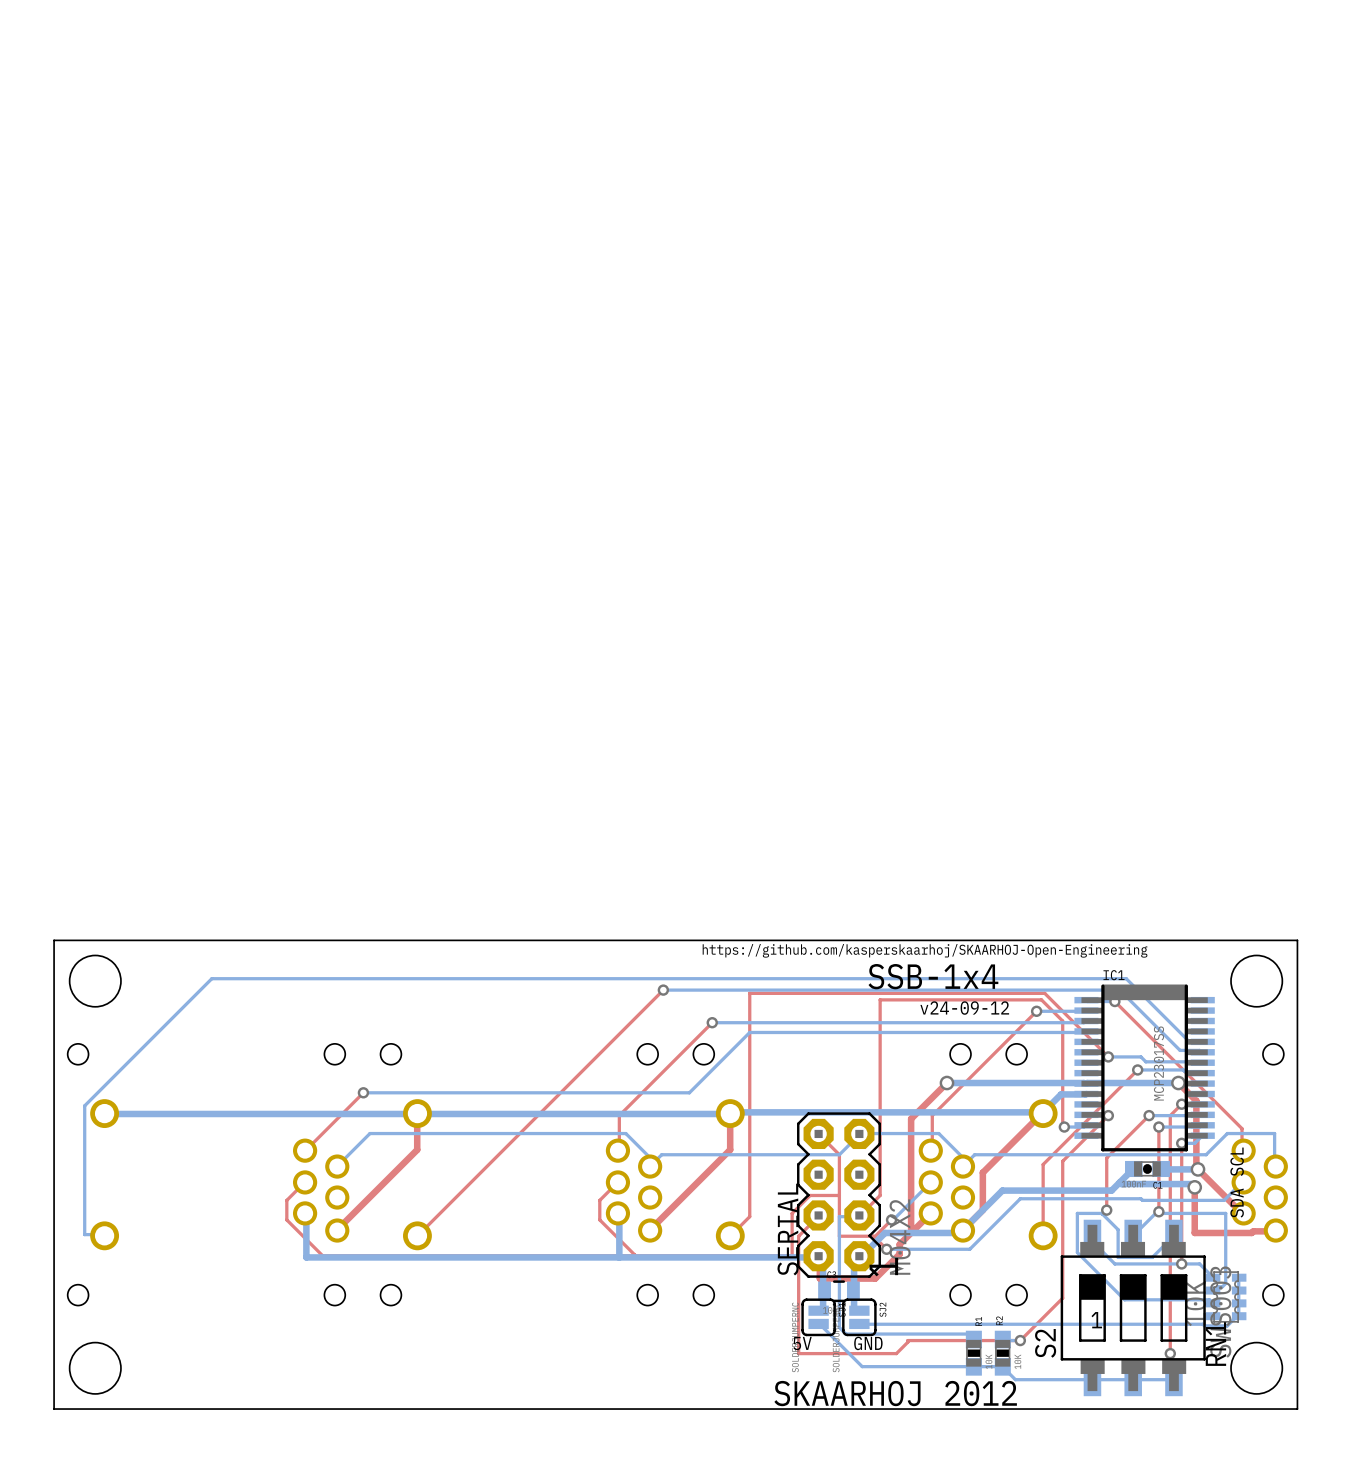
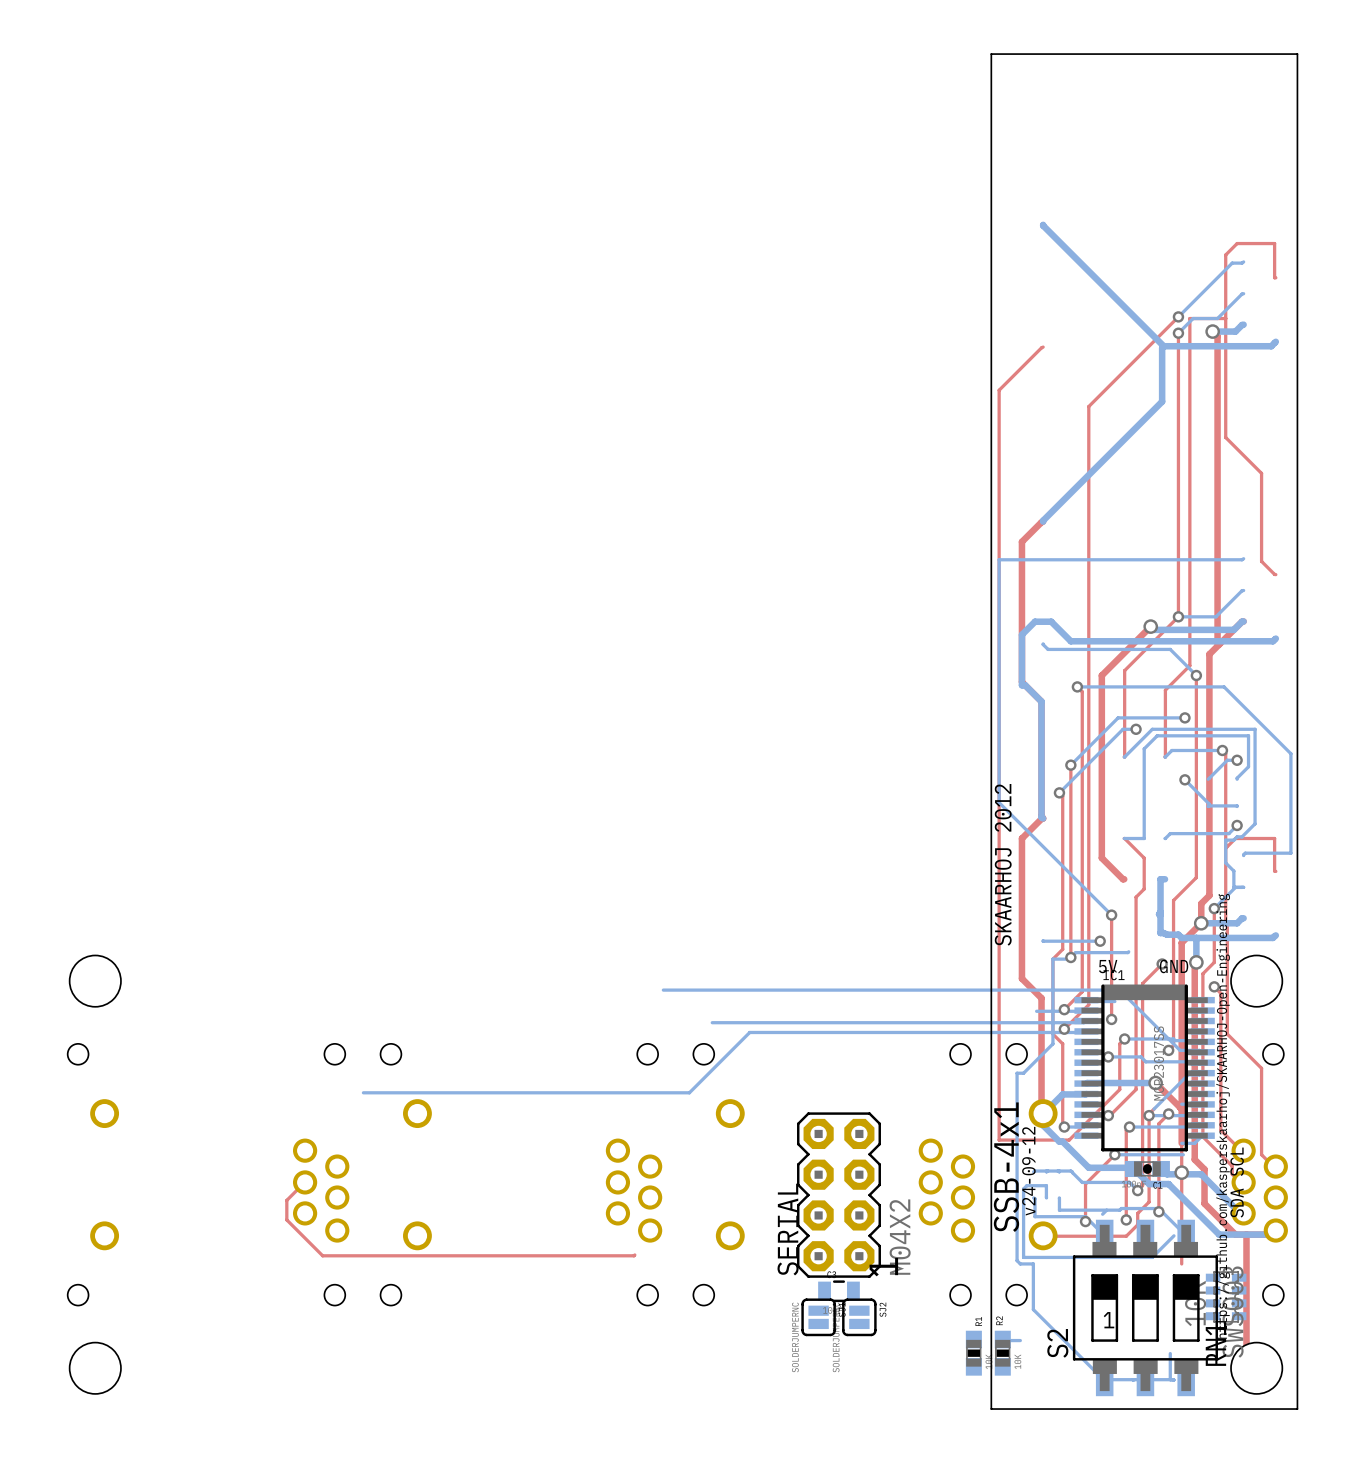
bottom track: none -> (1043, 224) (1163, 346)
bottom track: none -> (1243, 261) (1232, 263) (1178, 316)
top track: none -> (1275, 277) (1274, 243) (1237, 243) (1225, 254) (1225, 437) (1261, 473) (1261, 561) (1275, 574)
bottom track: none -> (1243, 293) (1217, 318) (1193, 318) (1178, 333)
top track: none -> (1178, 316) (1088, 406) (1088, 1004) (1064, 1029)
via: none -> (1178, 316)
top track: none -> (1225, 318) (1189, 318) (1189, 665) (1165, 690) (1164, 757)
bottom track: none -> (1243, 324) (1235, 331) (1212, 331)
top track: none -> (1212, 331) (1217, 336) (1217, 642) (1219, 644)
via: none -> (1212, 331)
top track: none -> (1178, 333) (1178, 616) (1124, 670) (1124, 757)
via: none -> (1178, 333)
bottom track: none -> (1275, 341) (1271, 346) (1163, 346)
bottom track: none -> (1163, 346) (1162, 347) (1162, 401) (1043, 521)
top track: none -> (1043, 347) (999, 390) (999, 1140) (1069, 1140) (1119, 1089) (1119, 1043) (1124, 1039)
top track: none -> (1043, 521) (1021, 541) (1021, 682) (1041, 701) (1041, 815) (1043, 818) (1021, 838) (1021, 978) (1041, 998) (1041, 1113) (1043, 1115)
bottom track: none -> (1243, 558) (999, 559) (999, 802) (1111, 915)
bottom track: none -> (1243, 590) (1215, 616) (1178, 616)
via: none -> (1178, 616)
bottom track: none -> (1243, 621) (1233, 629) (1153, 629) (1150, 626)
top track: none -> (1243, 621) (1209, 654) (1209, 895) (1201, 903) (1201, 923) (1181, 942) (1181, 1105) (1180, 1107)
top track: none -> (1150, 626) (1101, 675) (1101, 858) (1124, 879)
via: none -> (1150, 626)
bottom track: none -> (1275, 638) (1272, 641) (1070, 641) (1051, 621) (1035, 621) (1021, 634) (1021, 685) (1025, 685) (1041, 701) (1041, 817) (1043, 818)
bottom track: none -> (1043, 643) (1048, 649) (1170, 649) (1196, 675)
top track: none -> (1196, 675) (1196, 877) (1173, 900) (1173, 1045) (1168, 1050)
via: none -> (1196, 675)
bottom track: none -> (1077, 686) (1224, 686) (1290, 753) (1290, 853) (1245, 853) (1243, 855)
top track: none -> (1077, 686) (1082, 691) (1082, 991) (1064, 1009)
via: none -> (1077, 686)
bottom track: none -> (1184, 717) (1118, 717) (1070, 765)
via: none -> (1184, 717)
bottom track: none -> (1136, 729) (1123, 729) (1059, 792)
via: none -> (1136, 729)
bottom track: none -> (1222, 750) (1171, 750) (1164, 757)
top track: none -> (1222, 750) (1225, 753) (1226, 847)
via: none -> (1222, 750)
bottom track: none -> (1124, 757) (1152, 729) (1255, 729) (1255, 823) (1242, 836) (1237, 836) (1233, 840) (1225, 840) (1225, 862) (1233, 871) (1233, 887) (1243, 887) (1235, 887) (1214, 908)
bottom track: none -> (1237, 760) (1227, 760) (1208, 779)
via: none -> (1237, 760)
top track: none -> (1070, 765) (1070, 957)
via: none -> (1070, 765)
bottom track: none -> (1184, 779) (1209, 804) (1208, 806) (1237, 806)
via: none -> (1184, 779)
bottom track: none -> (1237, 779) (1248, 766) (1248, 735) (1157, 735) (1144, 748) (1144, 838) (1124, 838)
via: none -> (1059, 792)
bottom track: none -> (1237, 825) (1228, 833) (1170, 833) (1164, 838)
via: none -> (1237, 825)
top track: none -> (1124, 838) (1144, 858) (1144, 889) (1136, 897) (1136, 1089) (1111, 1113)
text: none -> SKAARHOJ 2012 (1003, 864)
top track: none -> (1275, 871) (1274, 838) (1235, 838) (1225, 848) (1227, 1034) (1261, 1068) (1261, 1154) (1275, 1168)
bottom track: none -> (1164, 879) (1160, 879) (1160, 933) (1178, 934) (1181, 937) (1272, 937) (1275, 935)
top track: none -> (1214, 908) (1214, 962) (1202, 973) (1202, 1136) (1232, 1166) (1232, 1174) (1243, 1184)
via: none -> (1214, 908)
top track: none -> (1111, 915) (1111, 1019)
via: none -> (1111, 915)
bottom track: none -> (1243, 918) (1237, 923) (1201, 923)
via: none -> (1201, 923)
bottom track: none -> (1196, 937) (1196, 962)
bottom track: none -> (1043, 940) (1100, 941)
board edge: (1297, 940) (54, 940) (54, 1409) (991, 1409) -> (1297, 940) (1297, 54) (991, 54) (991, 1409)
via: none -> (1100, 941)
text: https://github.com/kasperskaarhoj/SKAARHOJ-Open-Engineering (925, 950) -> none
via: none -> (1070, 957)
top track: none -> (1196, 962) (1194, 964) (1194, 1159) (1204, 1169) (1204, 1203) (1235, 1234) (1274, 1234) (1275, 1232)
via: none -> (1196, 962)
top track: none -> (1162, 964) (1142, 983) (1142, 1185) (1137, 1190)
via: none -> (1162, 964)
text: none -> 5V (1108, 966)
text: none -> GND (1174, 966)
text: SSB-1x4 (933, 976) -> none
top track: none -> (1214, 986) (1220, 993) (1220, 1130) (1243, 1152)
via: none -> (1214, 986)
top track: (663, 990) (417, 1235) -> none
via: (663, 990) -> none
top track: (1114, 1001) (1242, 1128) (1242, 1149) (1243, 1150) -> none
via position: (1114, 1001) -> (1111, 1019)
text rotation: 0° (964, 1008) -> 90° counterclockwise (1028, 1171)
text position: v24-09-12 (964, 1008) -> v24-09-12 (1028, 1171)
via: none -> (1064, 1009)
top track: (1036, 1011) (932, 1115) (930, 1150) -> none
via: (1036, 1011) -> none
top track: (712, 1022) (619, 1115) (617, 1150) -> none
via: (712, 1022) -> none
via: none -> (1064, 1029)
via: none -> (1124, 1039)
bottom track: (1188, 1040) (1126, 978) (211, 978) (84, 1105) (84, 1234) (104, 1235) -> (1188, 1040) (1124, 1039)
top track: (1062, 1043) (1062, 1021) (1041, 999) (880, 999) (880, 1195) (859, 1215) -> (1062, 1043) (1052, 1034) (1052, 959) (1062, 949) (1062, 796) (1059, 792)
via: none -> (1168, 1050)
top track: (1108, 1056) (1044, 993) (749, 993) (749, 1216) (730, 1235) -> none
bottom track: (1137, 1069) (1183, 1069) (1202, 1073) -> (1153, 1109) (1188, 1074) (1202, 1073)
top track: (1137, 1069) (1043, 1164) (1043, 1235) -> none
via: (1137, 1069) -> none
bottom track: (946, 1083) (1086, 1083) -> none
top track: (946, 1083) (911, 1118) (911, 1229) (912, 1231) -> none
via: (946, 1083) -> none
top track: none -> (1155, 1083) (1181, 1109) (1181, 1143)
bottom track: (1178, 1083) (1155, 1083) -> none
top track: (1178, 1083) (1196, 1100) (1196, 1167) (1243, 1213) -> none
via position: (1178, 1083) -> (1155, 1083)
top track: (363, 1092) (305, 1150) -> none
via: (363, 1092) -> none
bottom track: (1062, 1094) (1043, 1113) (1039, 1113) (1038, 1112) (104, 1113) -> none
top track: (1181, 1104) (1170, 1115) (1170, 1353) -> none
via: (1181, 1104) -> none
top track: none -> (1153, 1109) (1149, 1113) (1149, 1202) (1137, 1213) (1137, 1224) (1126, 1236) (1043, 1237)
top track: (417, 1113) (417, 1149) (337, 1230) -> none
top track: (730, 1113) (730, 1149) (650, 1230) -> none
top track: (1043, 1113) (982, 1172) (982, 1210) (962, 1230) -> none
top track: none -> (1168, 1113) (1158, 1123) (1158, 1127)
via: none -> (1168, 1113)
top track: (1108, 1115) (1062, 1161) (1062, 1298) (1020, 1340) (907, 1340) (896, 1353) (798, 1353) (798, 1236) (818, 1215) -> none
top track: (1149, 1115) (1106, 1157) (1106, 1210) -> none
text: none -> https://github.com/kasperskaarhoj/SKAARHOJ-Open-Engineering (1223, 1116)
top track: none -> (1129, 1127) (1126, 1130) (1126, 1219)
via: none -> (1129, 1127)
bottom track: none -> (1158, 1127) (1129, 1127)
via: (1158, 1127) -> none
top track: (818, 1133) (839, 1154) (839, 1236) (873, 1236) (886, 1249) -> none
via: (1181, 1143) -> none
bottom track: (1114, 1154) (974, 1154) (962, 1166) (966, 1161) (938, 1133) (860, 1133) (839, 1154) (661, 1154) (650, 1166) (653, 1161) (625, 1133) (369, 1133) (337, 1166) -> none
top track: none -> (1114, 1154) (1085, 1184) (1085, 1221)
via: none -> (1114, 1154)
bottom track: (1183, 1154) (1206, 1154) (1227, 1133) (1274, 1133) (1275, 1166) -> none
text: none -> SSB-4x1 (1006, 1167)
bottom track: (1133, 1169) (1111, 1190) (1002, 1190) (961, 1232) (885, 1232) (862, 1255) (854, 1257) (854, 1309) (859, 1310) -> none
bottom track: (1198, 1169) (1162, 1169) -> (1243, 1215) (1201, 1174) (1167, 1174) (1162, 1169)
via: (1198, 1169) -> none
bottom track: none -> (1033, 1171) (1070, 1171) (1082, 1182) (1129, 1182) (1137, 1190)
via: none -> (1181, 1172)
top track: (617, 1182) (599, 1200) (599, 1219) (635, 1255) (792, 1255) (792, 1213) (810, 1195) (839, 1195) -> none
bottom track: (930, 1182) (891, 1219) -> none
bottom track: (1119, 1182) (1121, 1184) (1149, 1184) -> (1062, 1094) (1044, 1112) (1043, 1125) (1088, 1167) (1132, 1167) (1149, 1184)
bottom track: (1243, 1182) (1224, 1200) (1020, 1198) (969, 1249) (886, 1249) -> none
bottom track: (1168, 1184) (1191, 1184) (1194, 1187) -> (1168, 1184) (1219, 1234) (1272, 1234) (1275, 1232)
top track: (1194, 1187) (1194, 1232) (1251, 1232) (1275, 1230) -> none
via: (1194, 1187) -> none
via: none -> (1137, 1190)
bottom track: none -> (1033, 1197) (1035, 1216) (1085, 1216) (1104, 1235)
bottom track: none -> (1059, 1197) (1059, 1210) (1158, 1208) (1186, 1235)
via: (1106, 1210) -> none
bottom track: (305, 1213) (306, 1257) (818, 1256) (823, 1257) (824, 1291) (823, 1309) (818, 1310) -> none
bottom track: (617, 1213) (619, 1257) -> none
top track: (930, 1213) (899, 1244) (899, 1254) (875, 1278) (819, 1278) (818, 1256) -> none
bottom track: (859, 1215) (839, 1216) (839, 1327) (845, 1334) (968, 1334) (973, 1339) -> none
top track: (891, 1219) (874, 1237) -> none
via: (891, 1219) -> none
via: none -> (1126, 1219)
via: none -> (1085, 1221)
top track: none -> (1246, 1234) (1246, 1368) (1256, 1368)
bottom track: (1092, 1235) (1093, 1242) (1114, 1263) (1199, 1263) (1213, 1277) -> none
bottom track: (1133, 1235) (1155, 1213) (1225, 1213) (1225, 1283) (1213, 1290) -> none
via: (886, 1249) -> none
bottom track: (1118, 1257) (1118, 1229) (1101, 1213) (1077, 1213) (1077, 1252) (1124, 1299) (1209, 1299) (1213, 1303) -> (1118, 1257) (1023, 1257) (1023, 1188) (1026, 1185) (1046, 1185) (1046, 1197)
via: (1181, 1263) -> none
bottom track: (1239, 1277) (1239, 1316) (1227, 1325) (1204, 1325) (1202, 1324) (859, 1323) -> none
S2 position: (1133, 1307) -> (1145, 1307)
bottom track: (818, 1323) (862, 1366) (1002, 1366) (1015, 1379) (1105, 1379) -> (1128, 951) (1075, 952) (1069, 959) (1052, 959) (1052, 1043) (1023, 1073) (1017, 1073) (1017, 1260) (1020, 1263) (1033, 1263) (1033, 1309) (1105, 1379)
via: (1020, 1340) -> none
text: 5V (802, 1343) -> none
text: GND (868, 1343) -> none
via: (1170, 1353) -> none
text: SKAARHOJ 2012 (895, 1393) -> none

